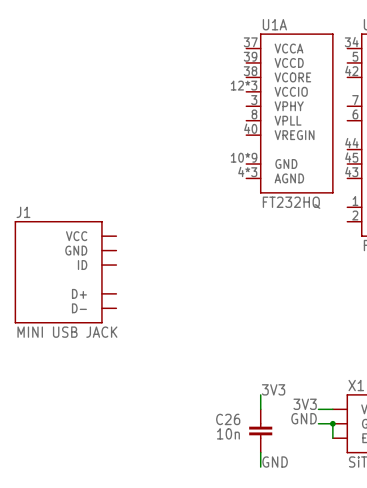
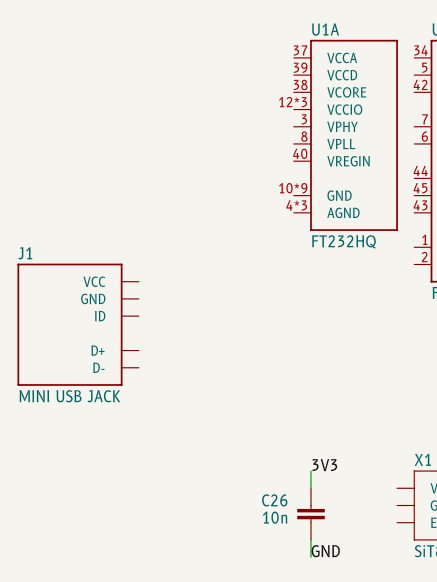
label: 3V3 (305, 404) -> none
wire: (318, 409) (332, 409) -> none
label: GND (304, 418) -> none
wire: (318, 423) (332, 423) (332, 438) -> none
junction: (332, 423) -> none

